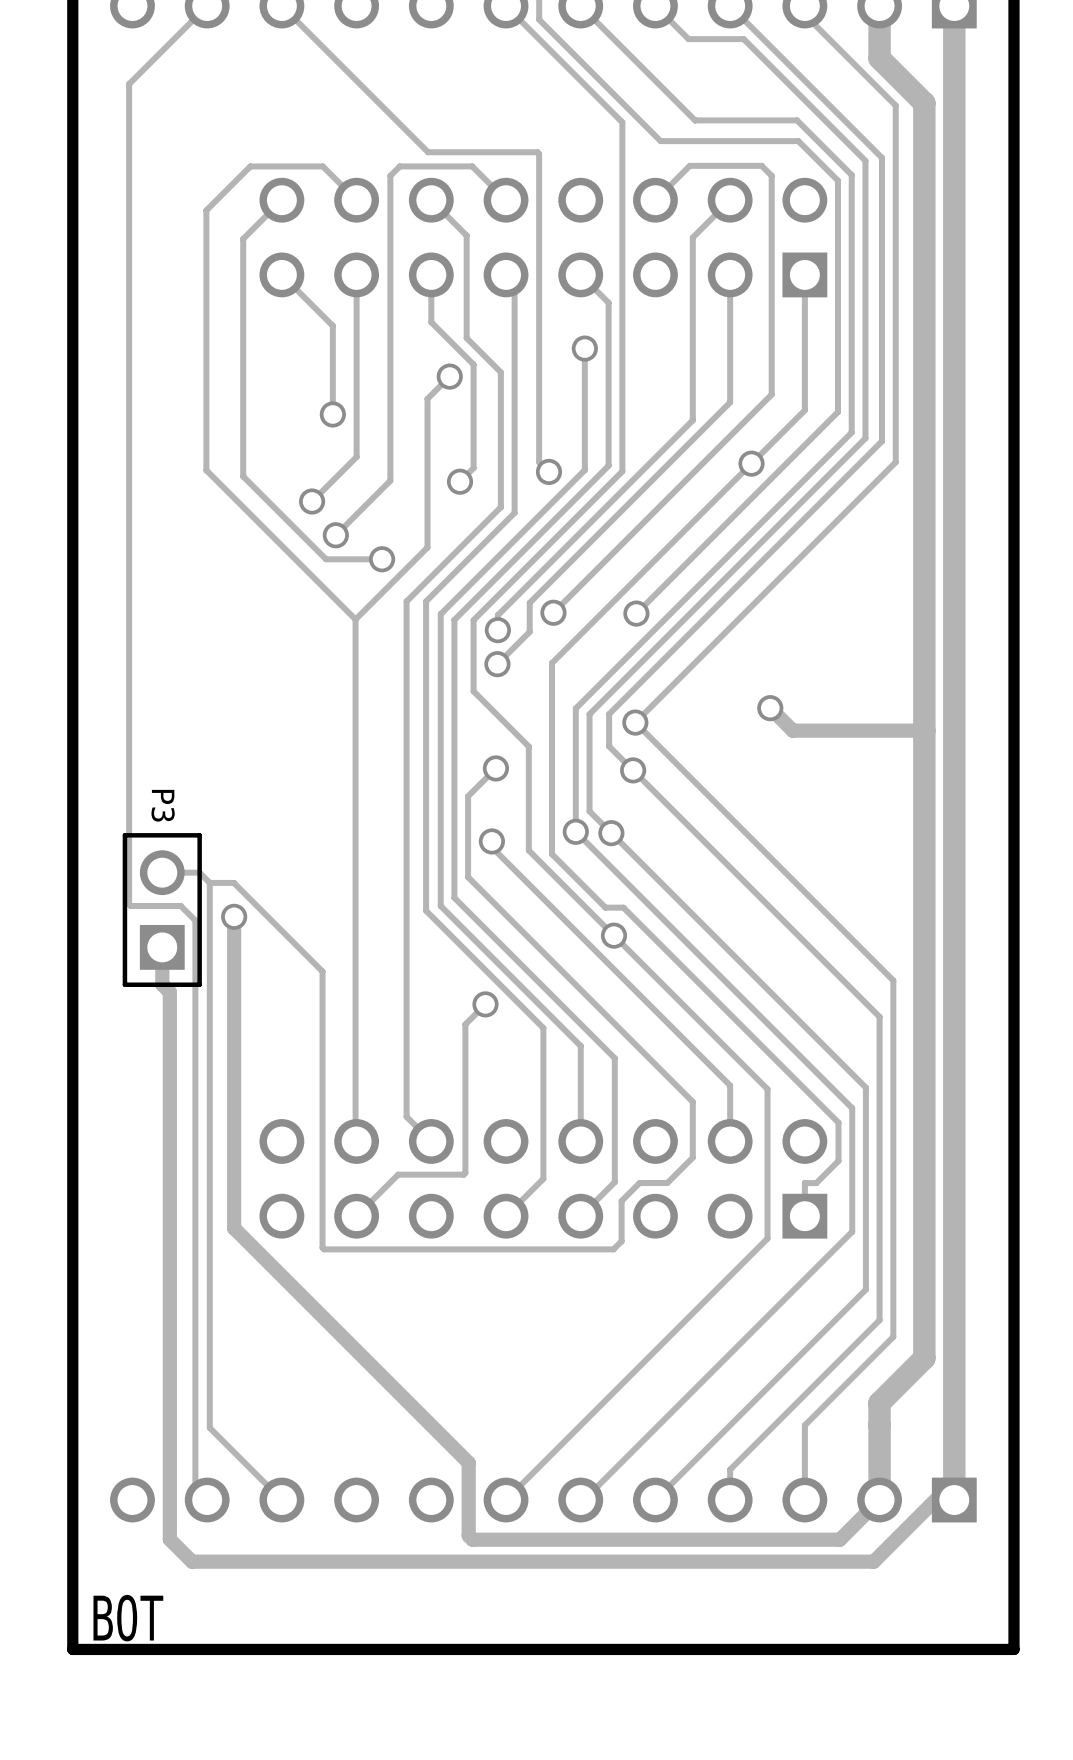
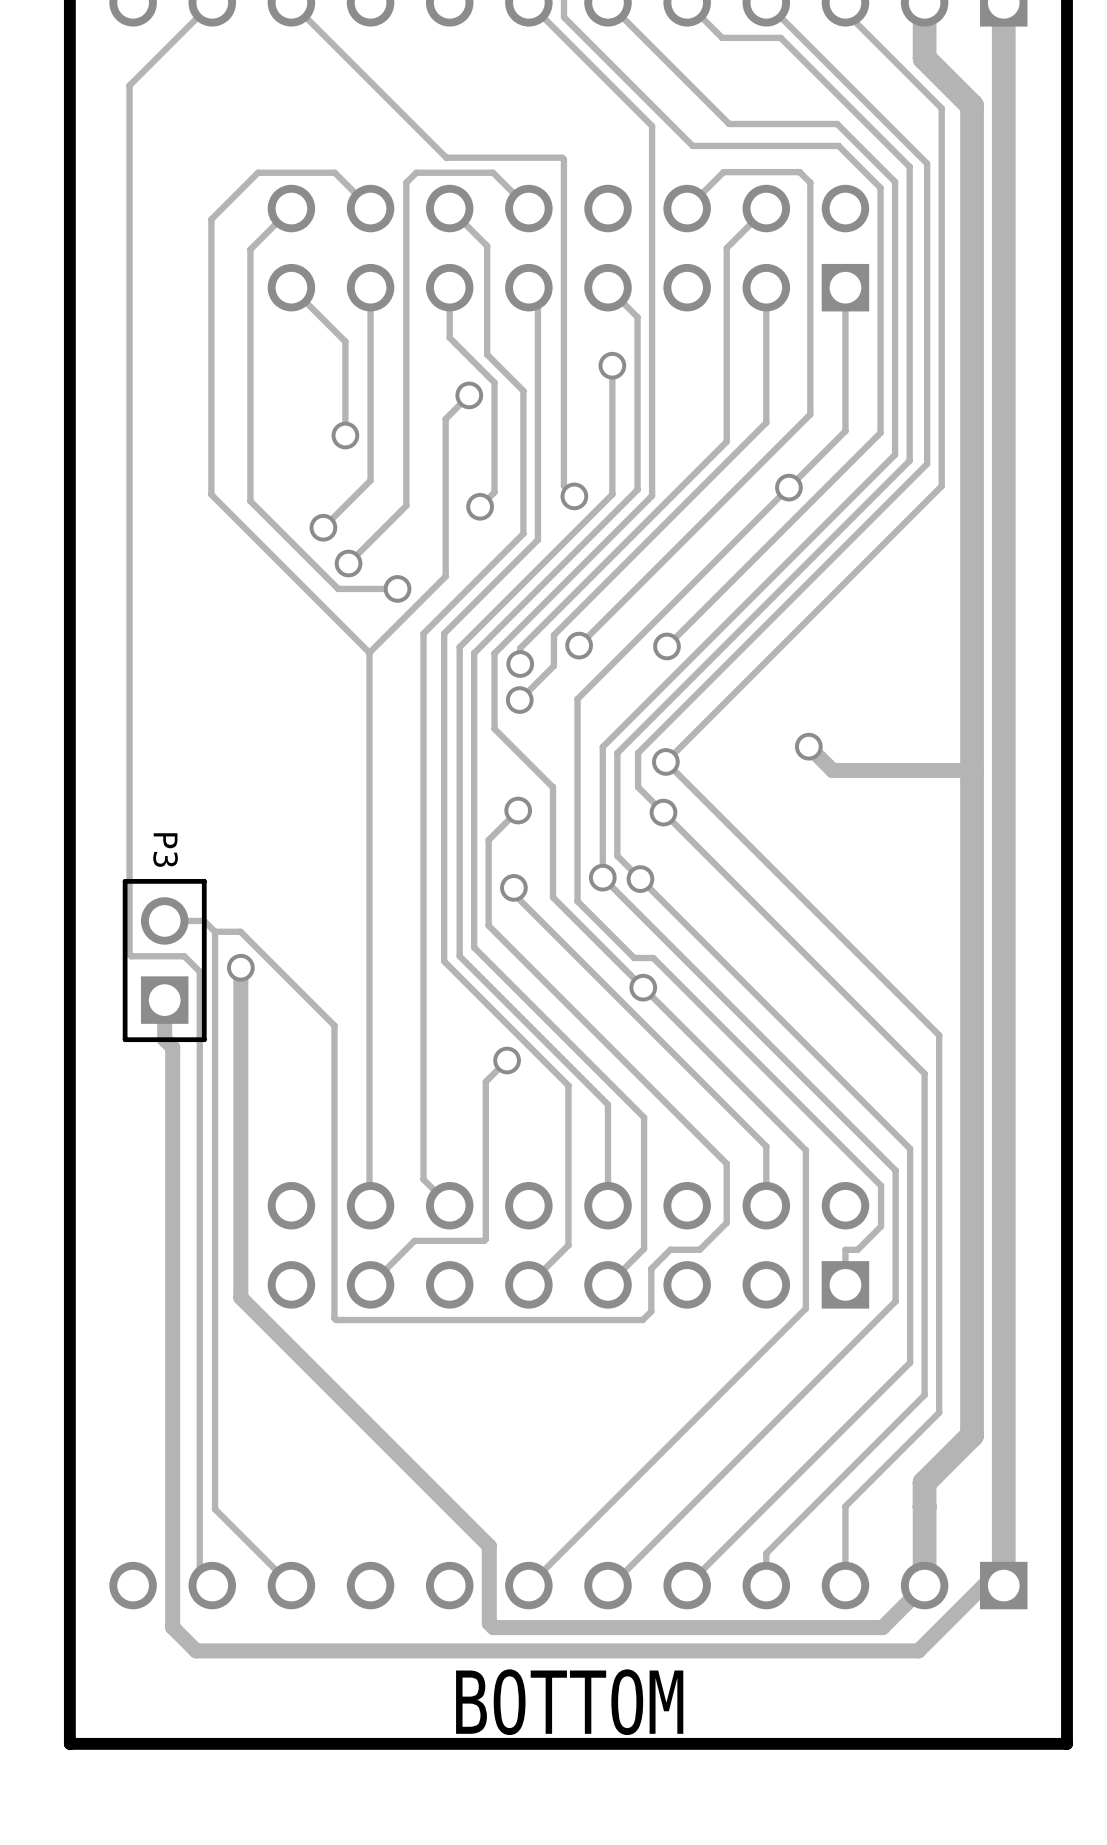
text: none -> BOTTOM (569, 1702)
text: BOT (128, 1618) -> none

